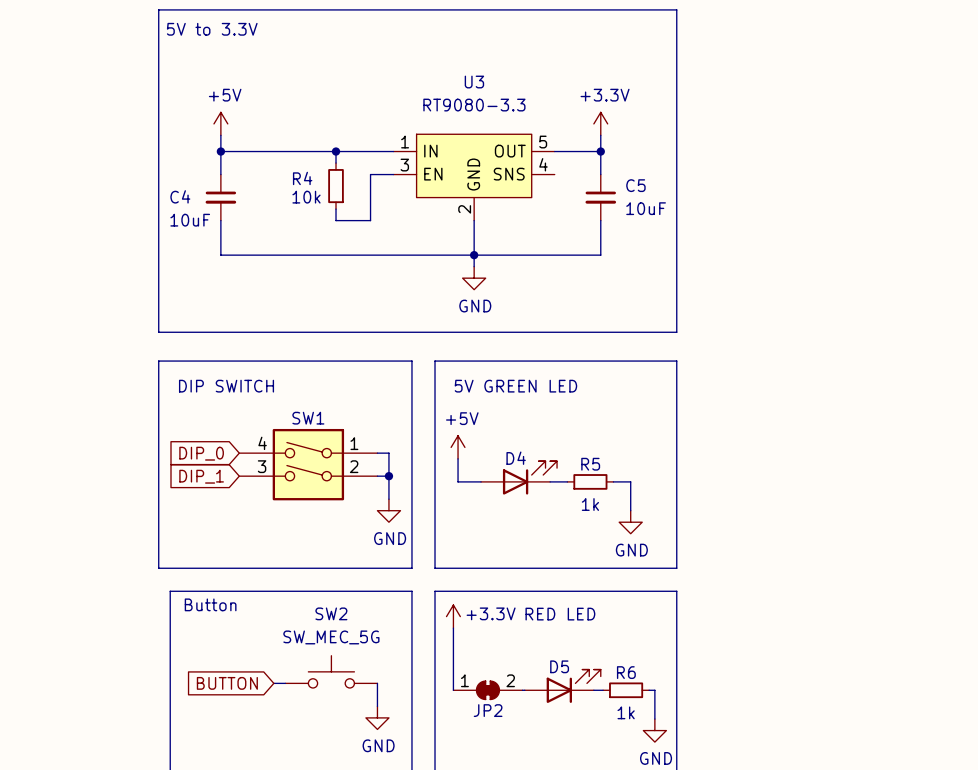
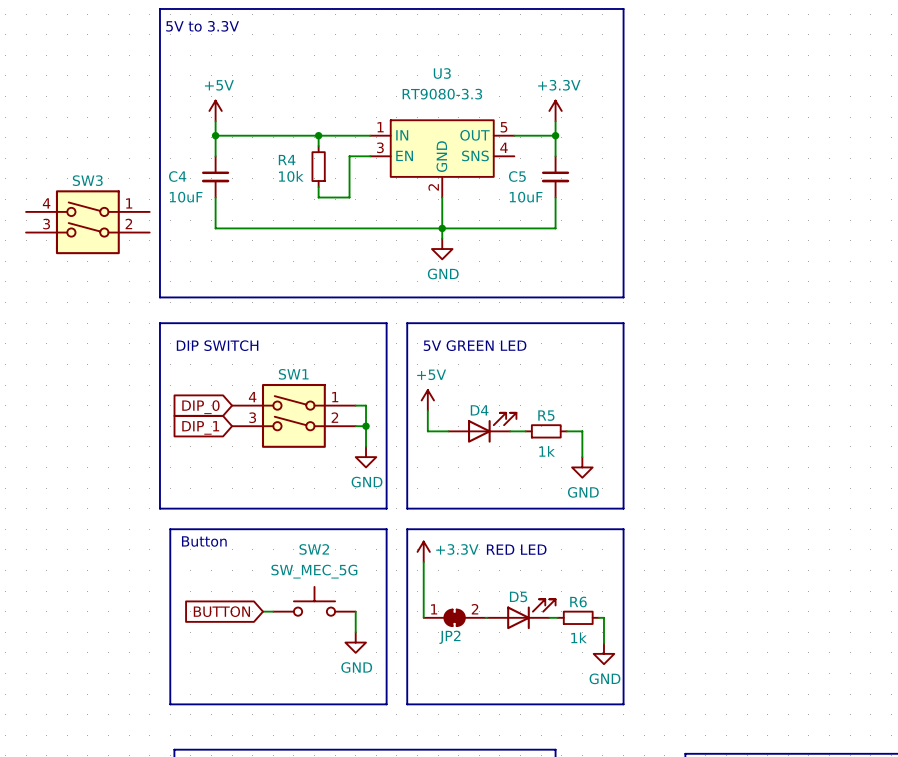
C5 name position: C5 (635, 185) -> C5 (517, 176)
C5 value position: 10uF (646, 208) -> 10uF (526, 197)
SW3: none -> (87, 222)

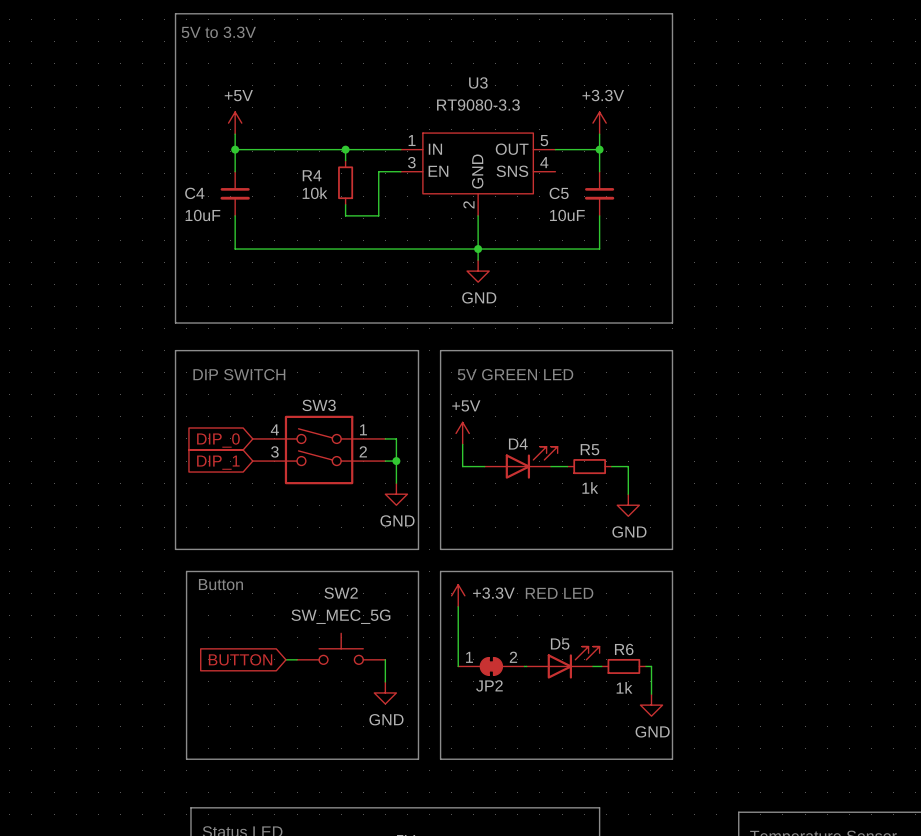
SW3: (87, 222) -> none
SW1 name: SW1 (293, 374) -> SW3 (319, 405)

